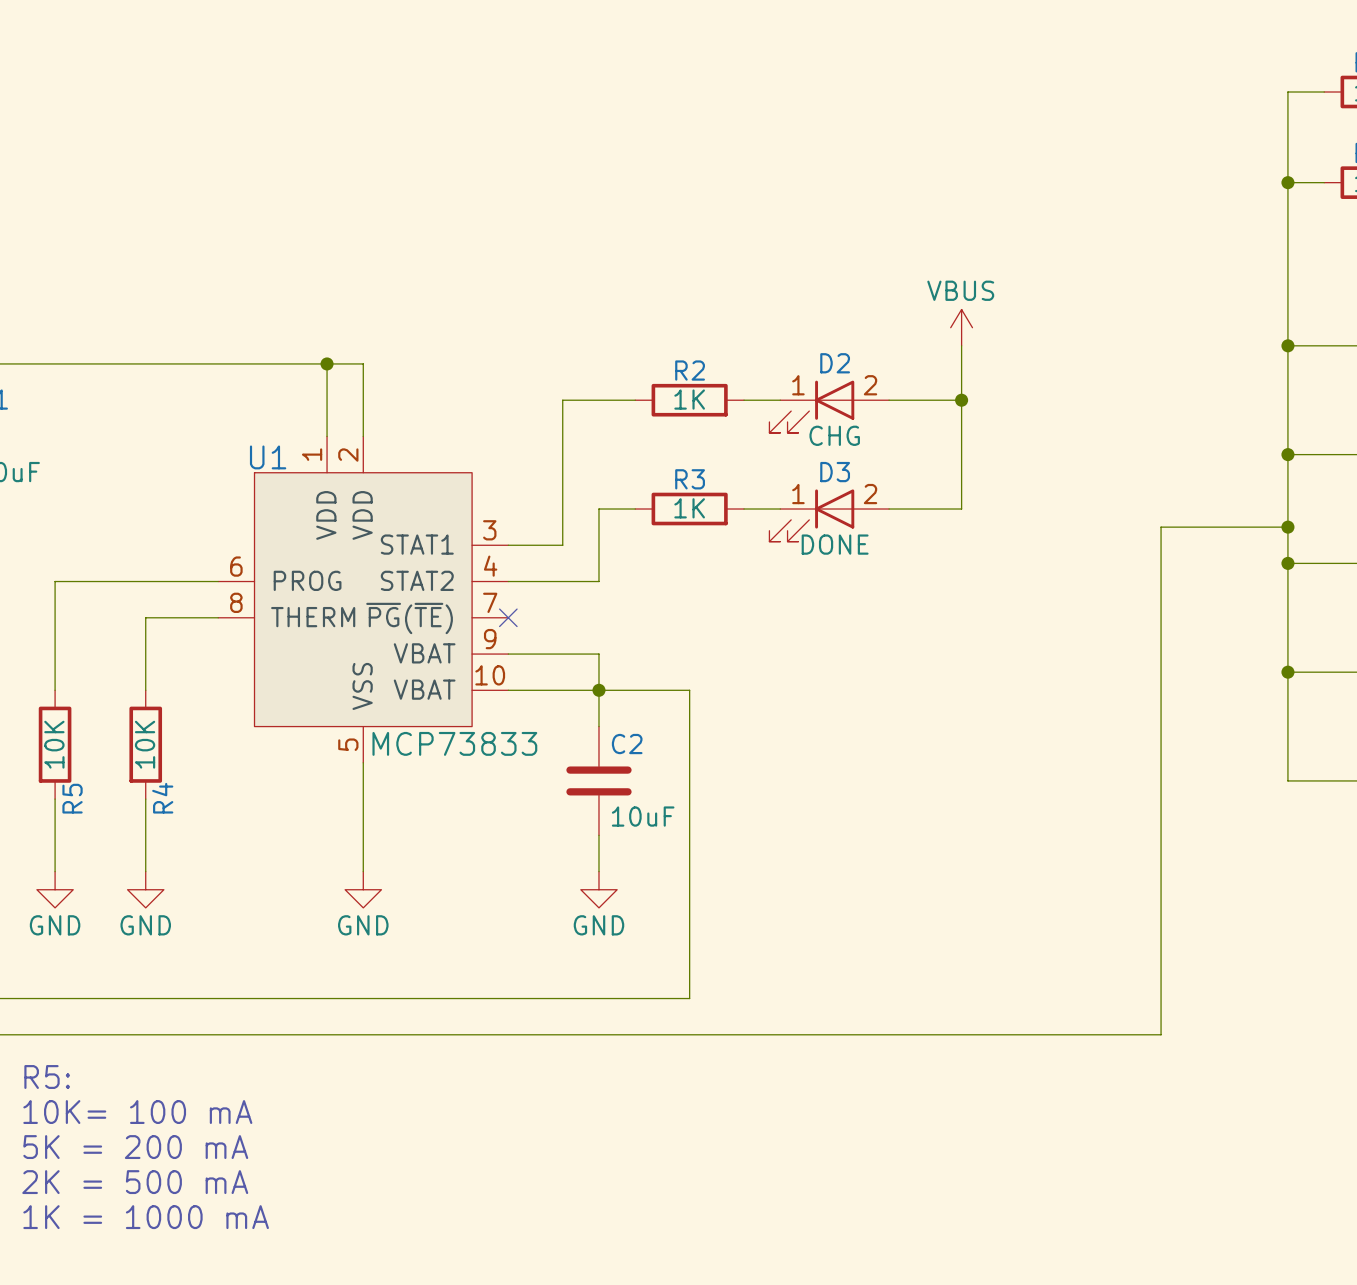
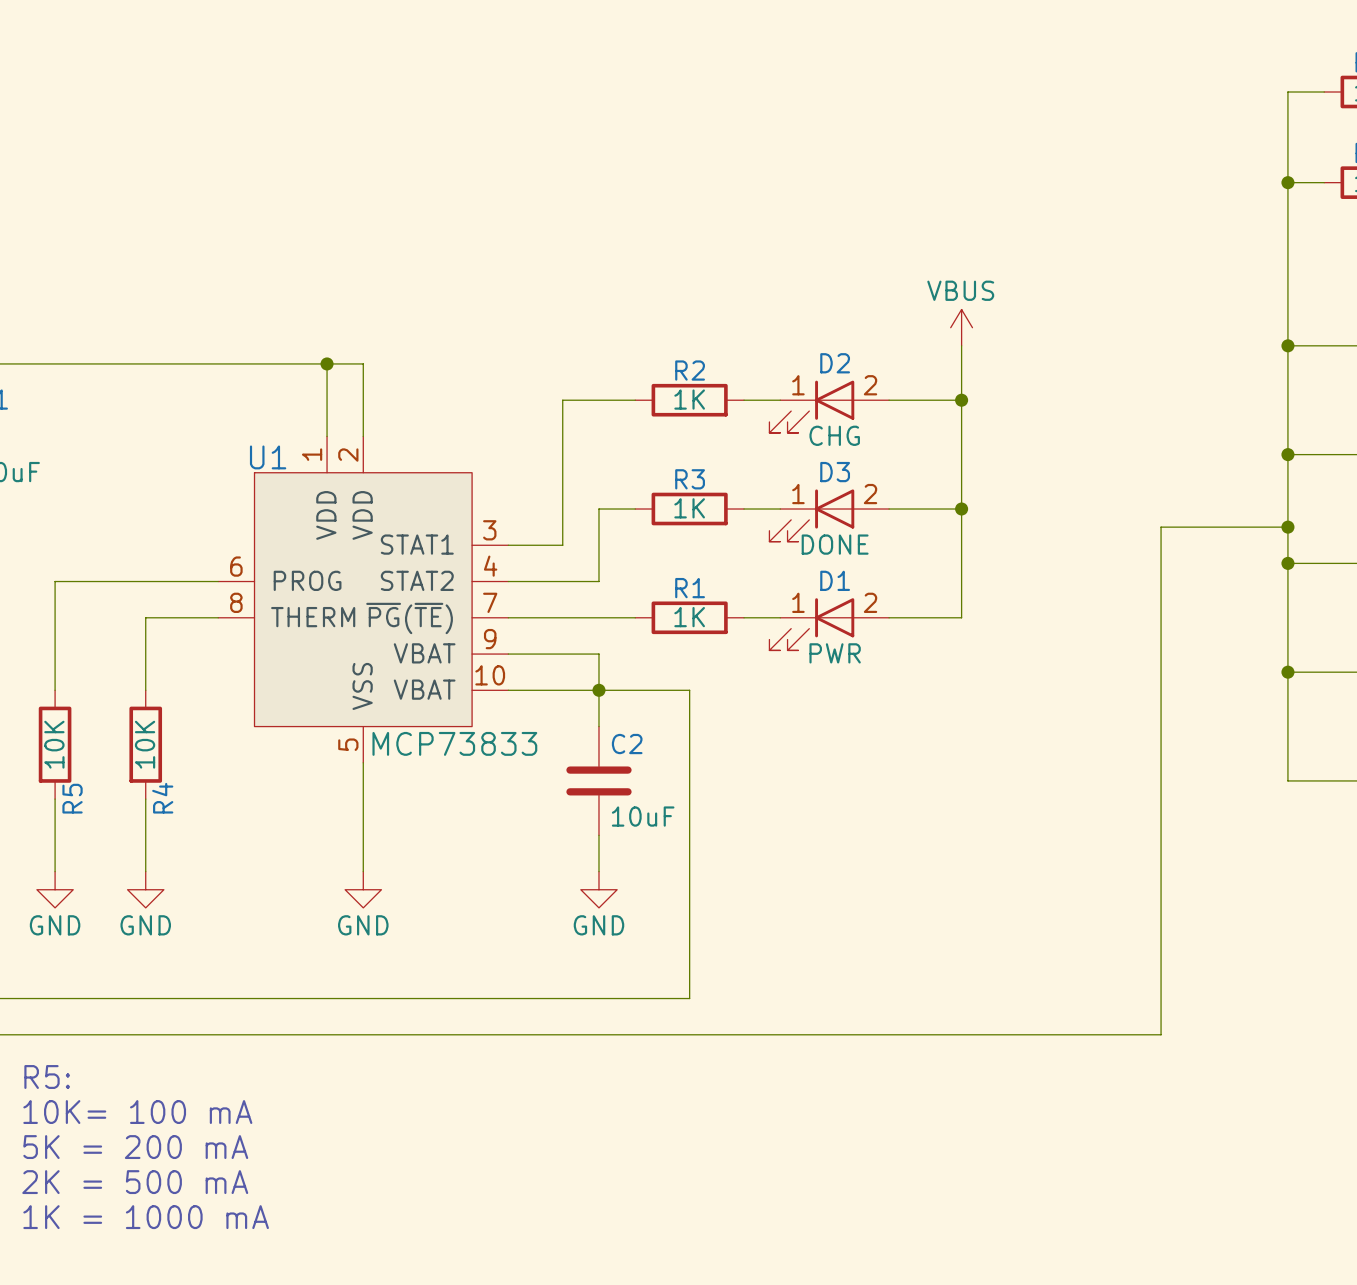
wire: none -> (961, 509) (961, 617) (889, 617)
junction: none -> (961, 509)
wire: none -> (508, 617) (635, 617)
no-connect mark: (508, 617) -> none
R1: none -> 1K (689, 617)
wire: none -> (744, 617) (780, 617)
D1: none -> PWR (829, 624)

